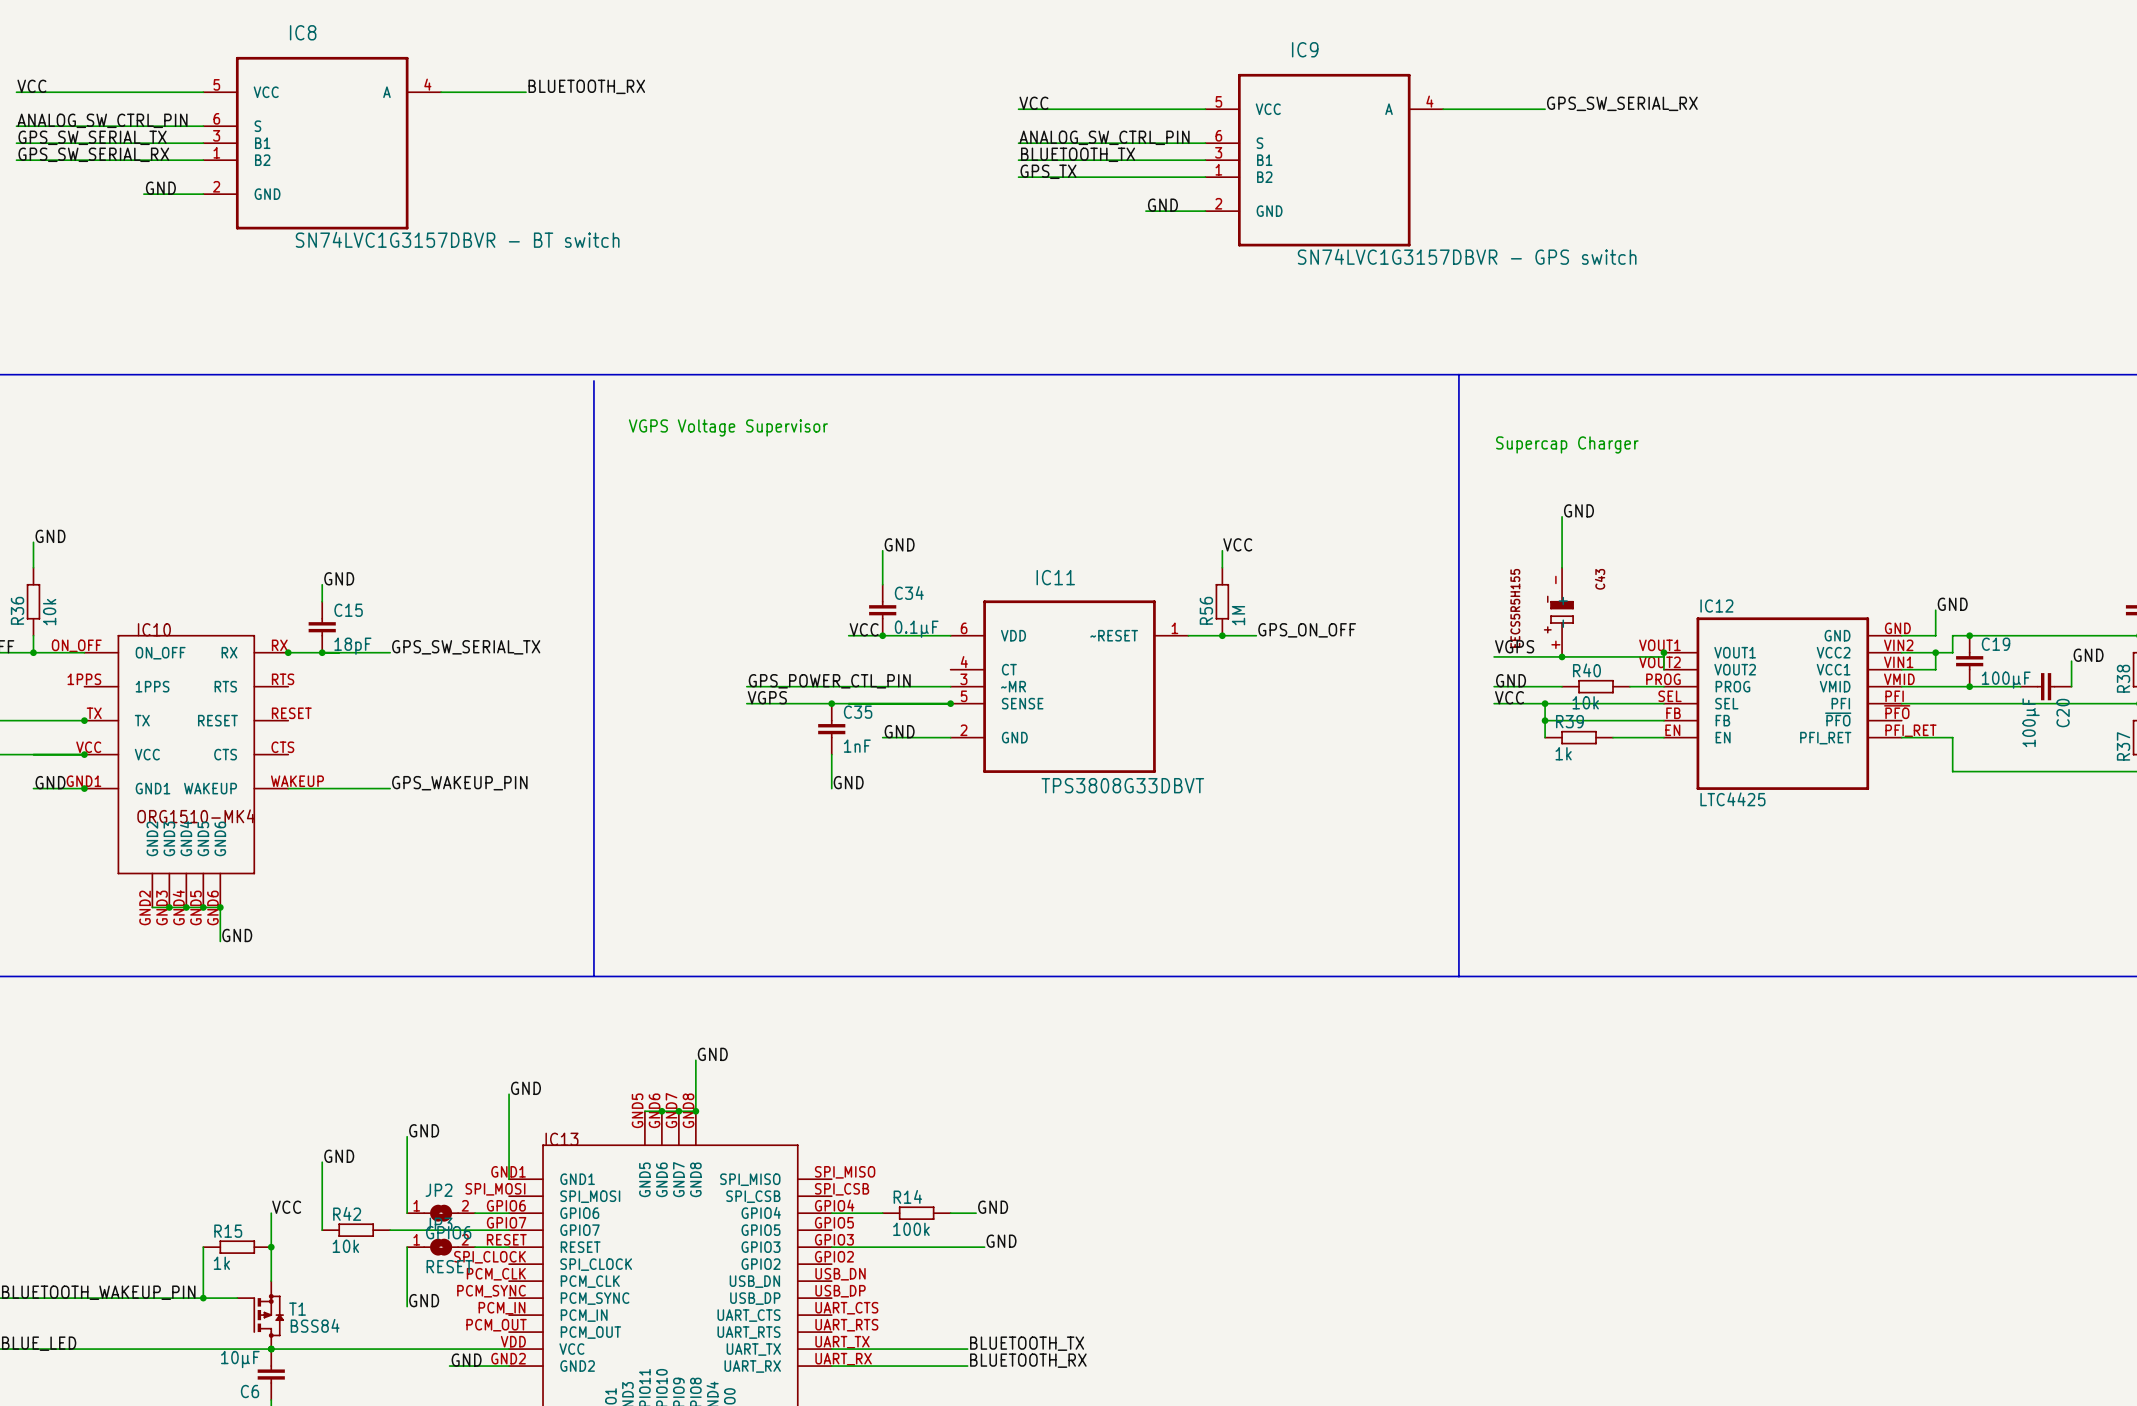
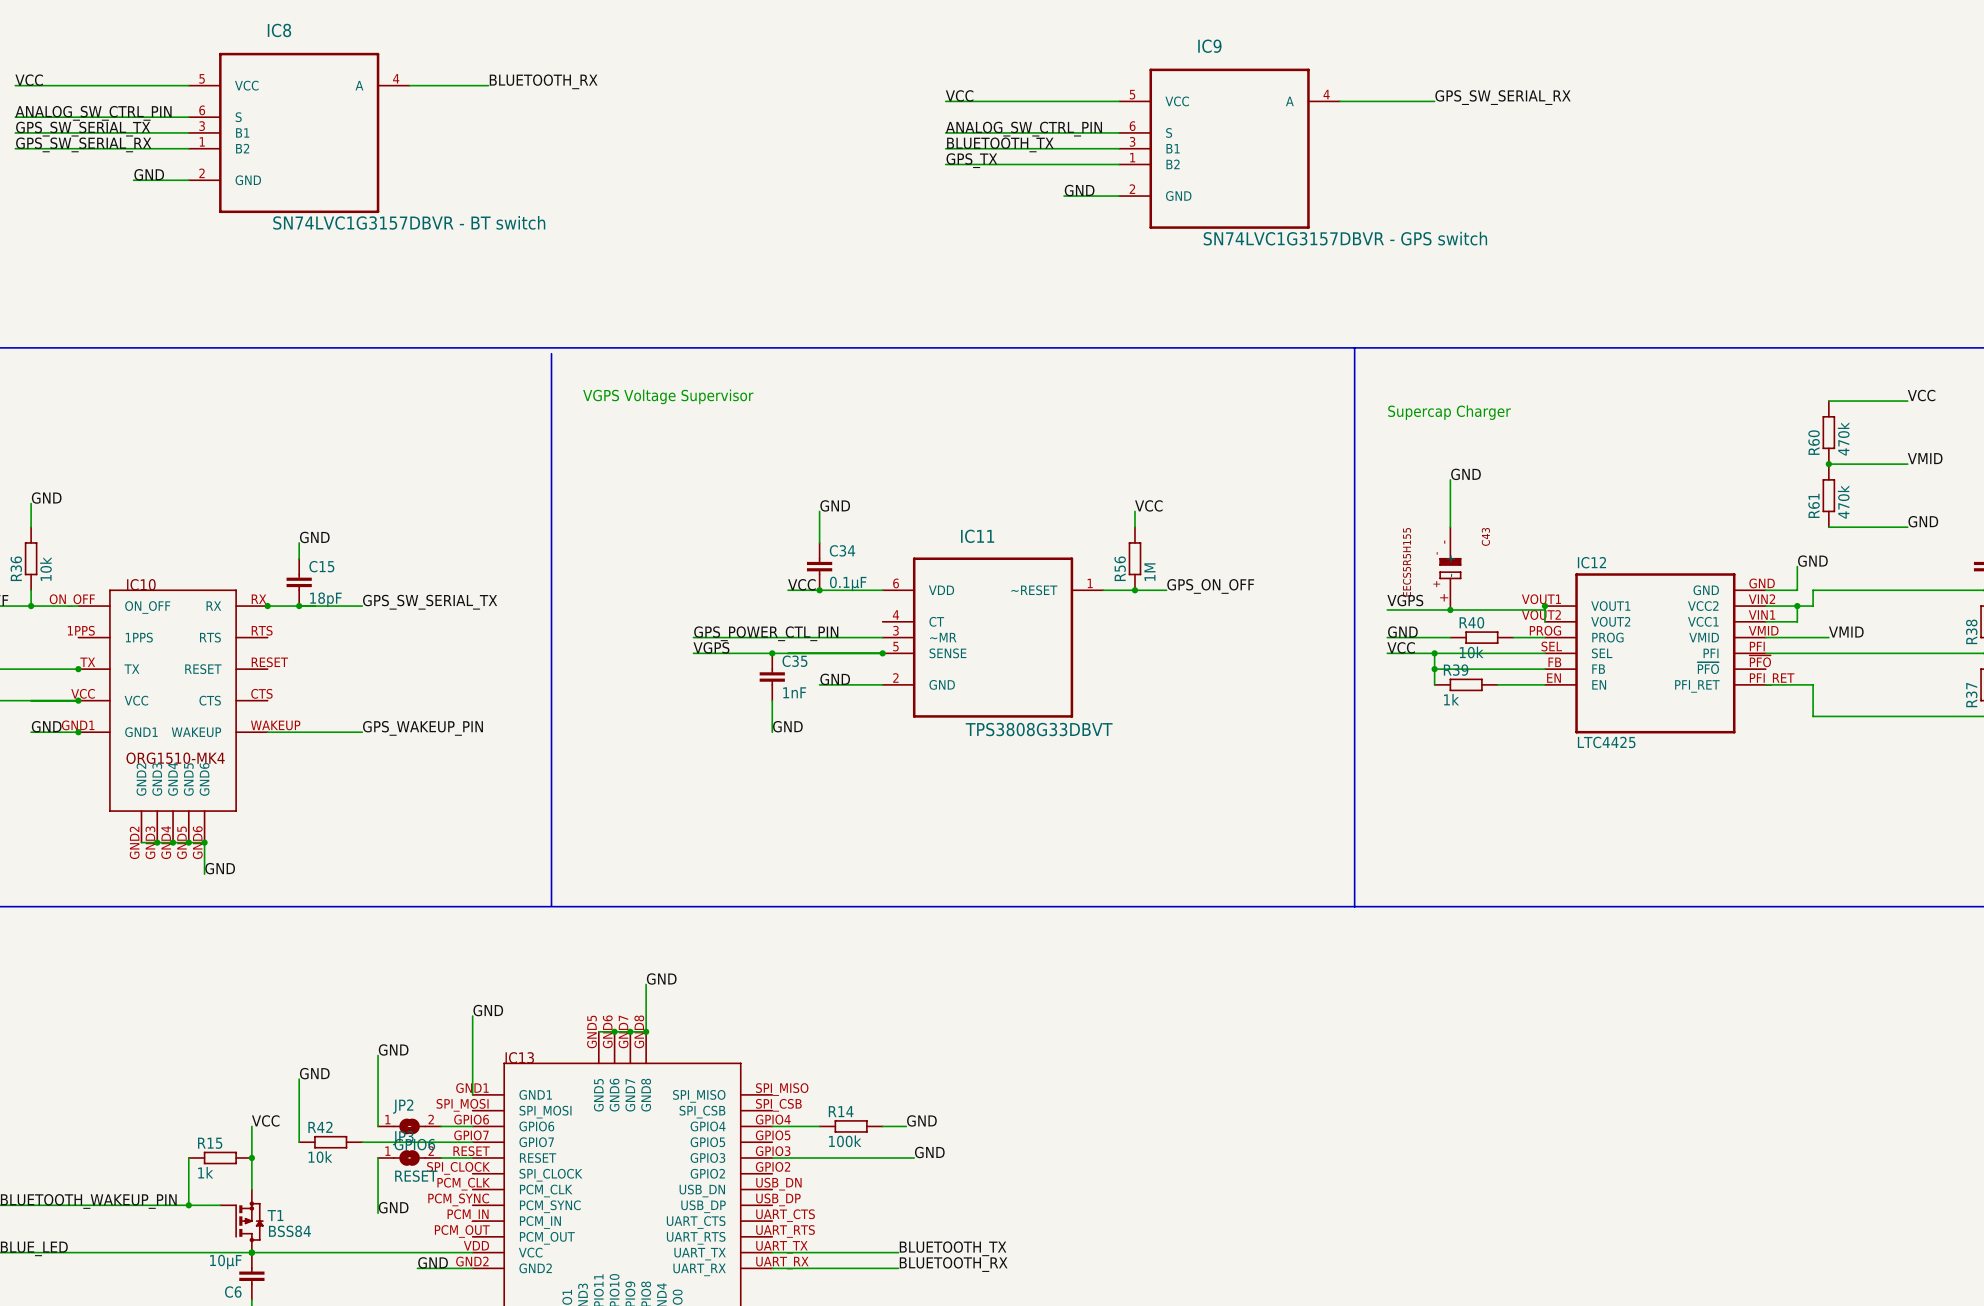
label: none -> VCC (1921, 395)
wire: none -> (1828, 401) (1907, 401)
R60: none -> 470k (1828, 432)
label: none -> VMID (1925, 458)
wire: none -> (1828, 464) (1907, 464)
junction: none -> (1828, 464)
R61: none -> 470k (1828, 495)
wire: none -> (1828, 527) (1907, 527)
junction: (1969, 635) -> none
label position: GND (2088, 655) -> GND (1923, 521)
C19: 100µF (1969, 661) -> none
wire: (2071, 661) (2071, 686) -> none
label: none -> VMID (1846, 632)
wire: (1969, 686) (2020, 686) -> none
junction: (1969, 686) -> none
C20: 100µF (2046, 686) -> none

